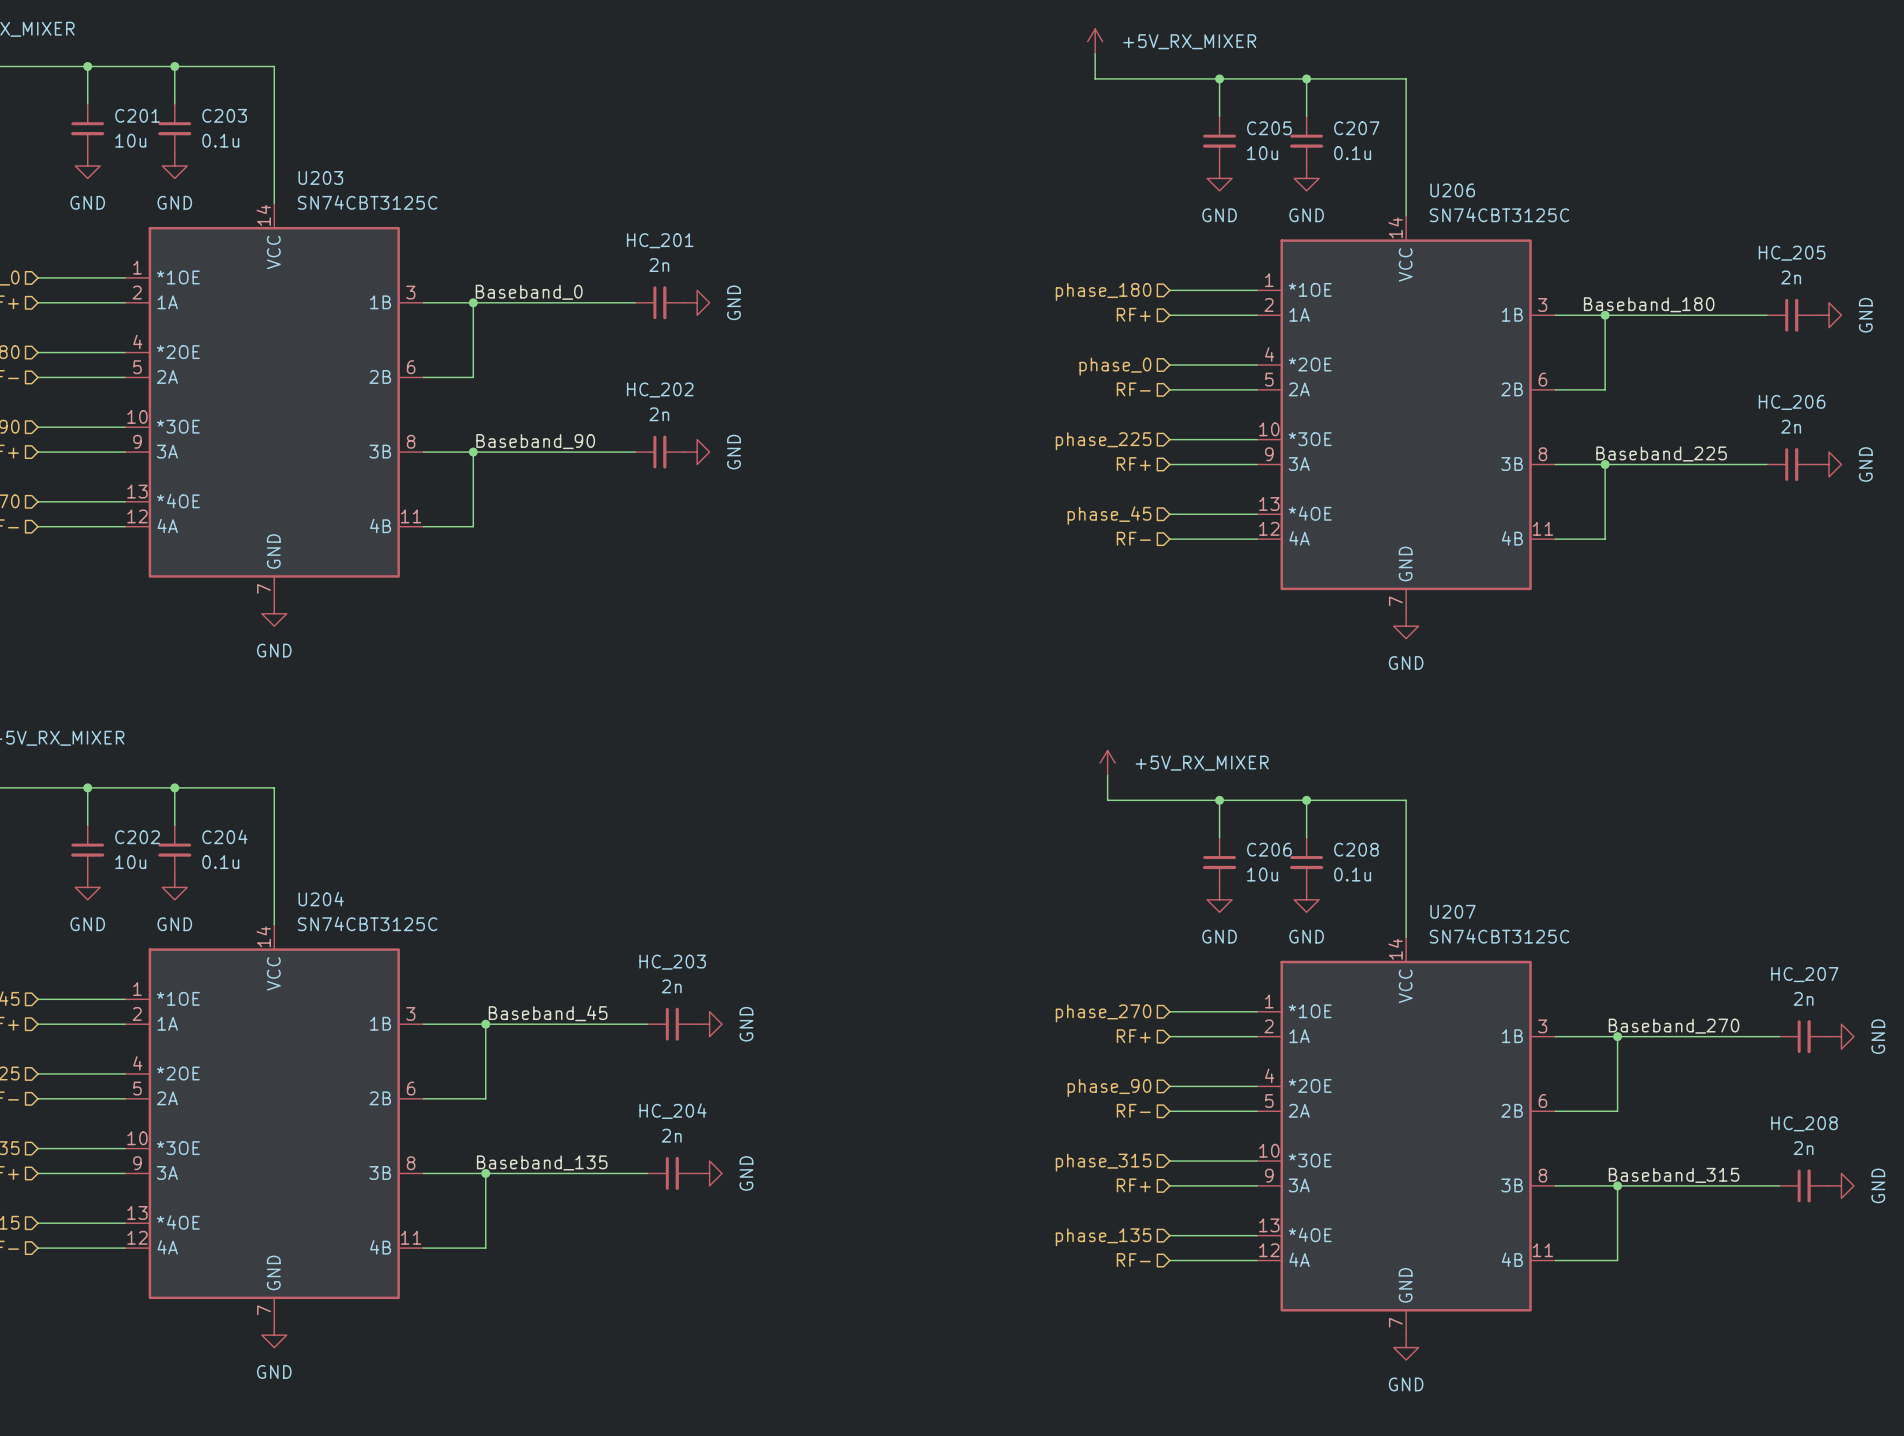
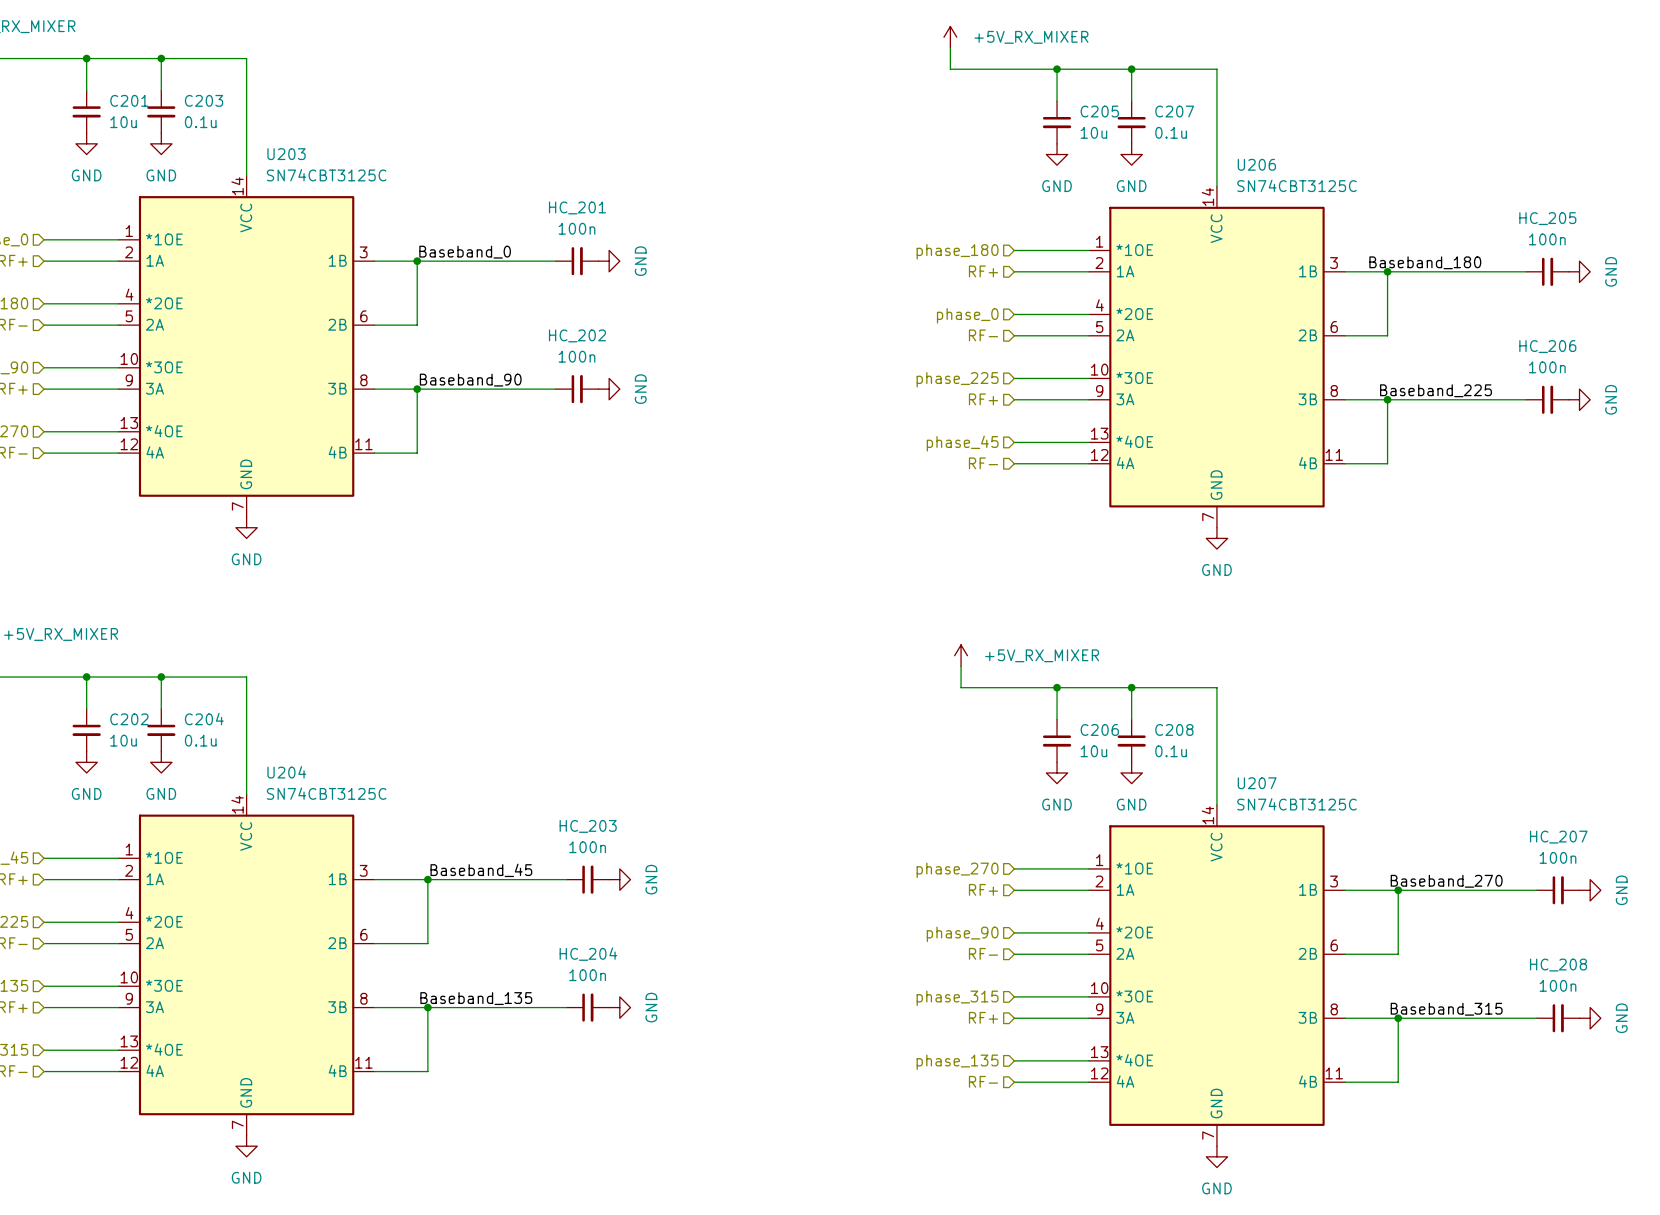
HC_201 value: 2n (659, 265) -> 100n (576, 228)
HC_205 value: 2n (1791, 277) -> 100n (1547, 239)
HC_202 value: 2n (659, 414) -> 100n (576, 356)
HC_206 value: 2n (1791, 426) -> 100n (1547, 367)
HC_203 value: 2n (671, 986) -> 100n (587, 847)
HC_207 value: 2n (1803, 998) -> 100n (1557, 857)
HC_204 value: 2n (671, 1135) -> 100n (587, 975)
HC_208 value: 2n (1803, 1148) -> 100n (1557, 985)

